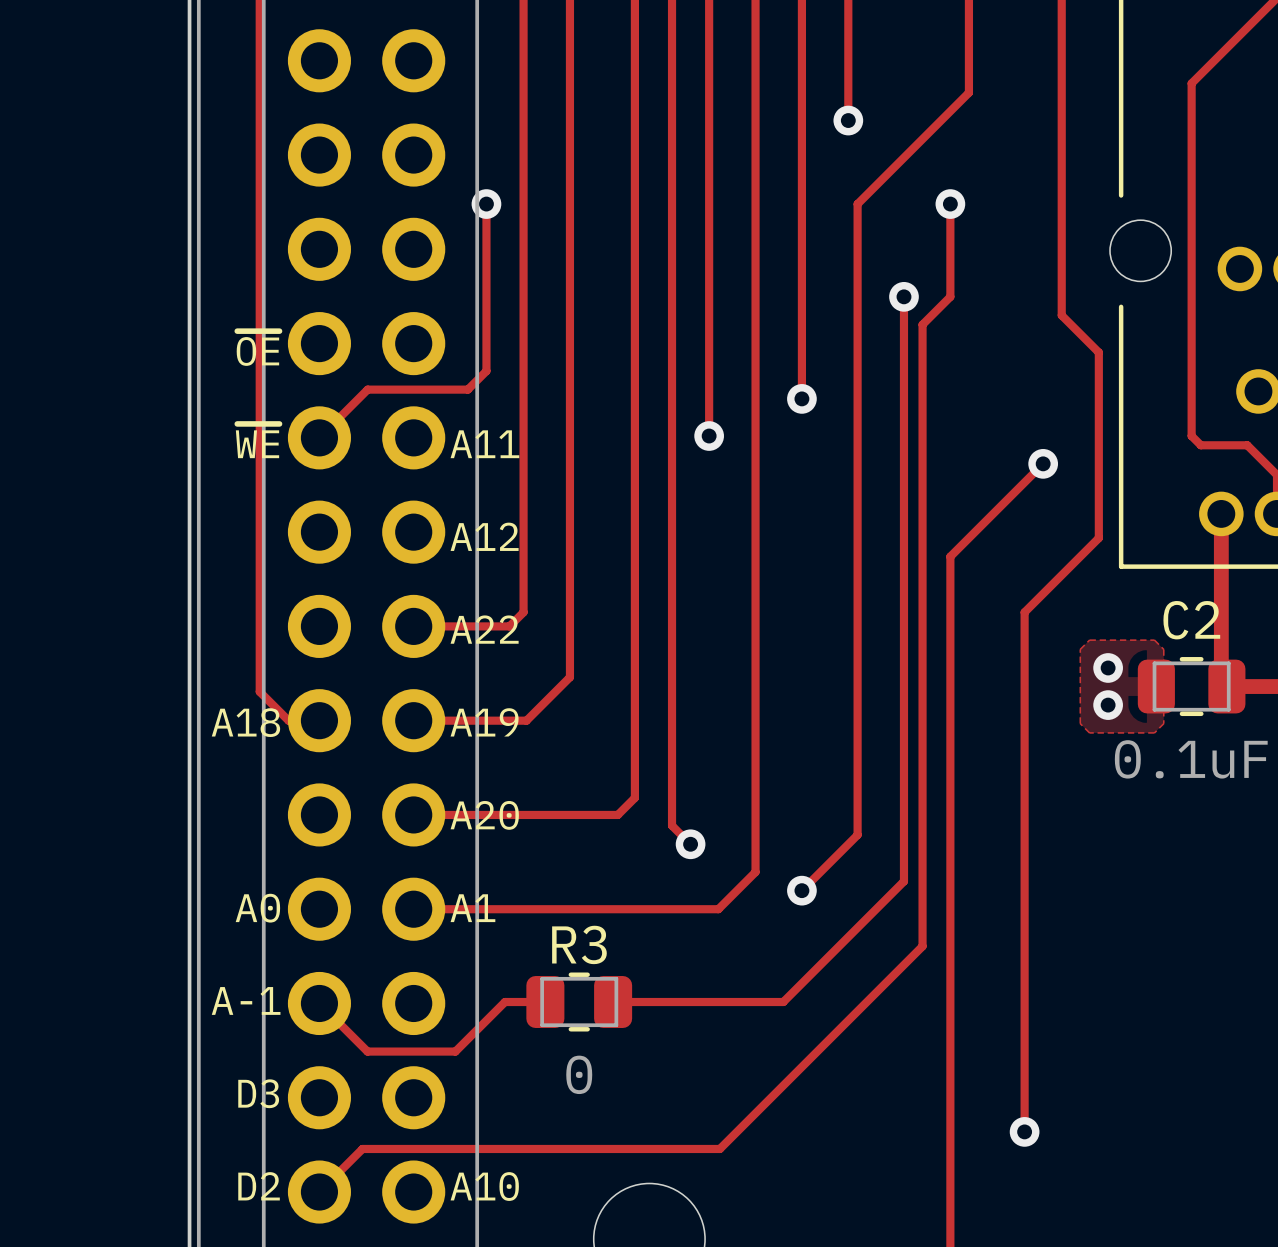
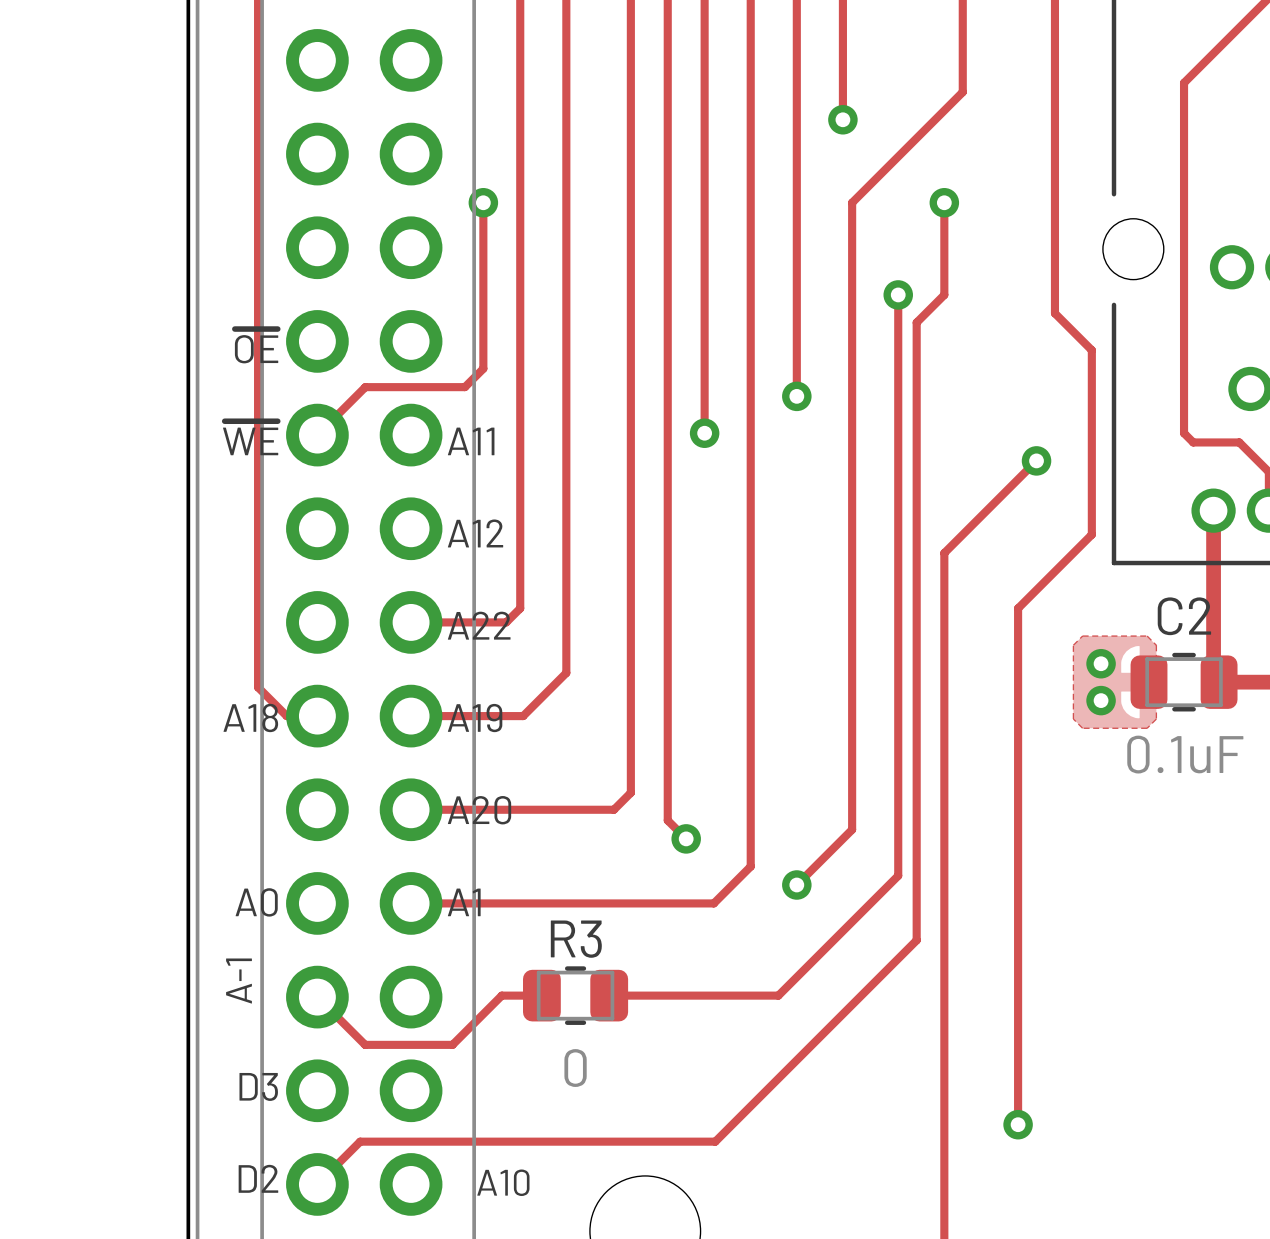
text rotation: 0° (246, 1000) -> 90° counterclockwise (239, 981)
text position: A10 (484, 1186) -> A10 (503, 1182)

